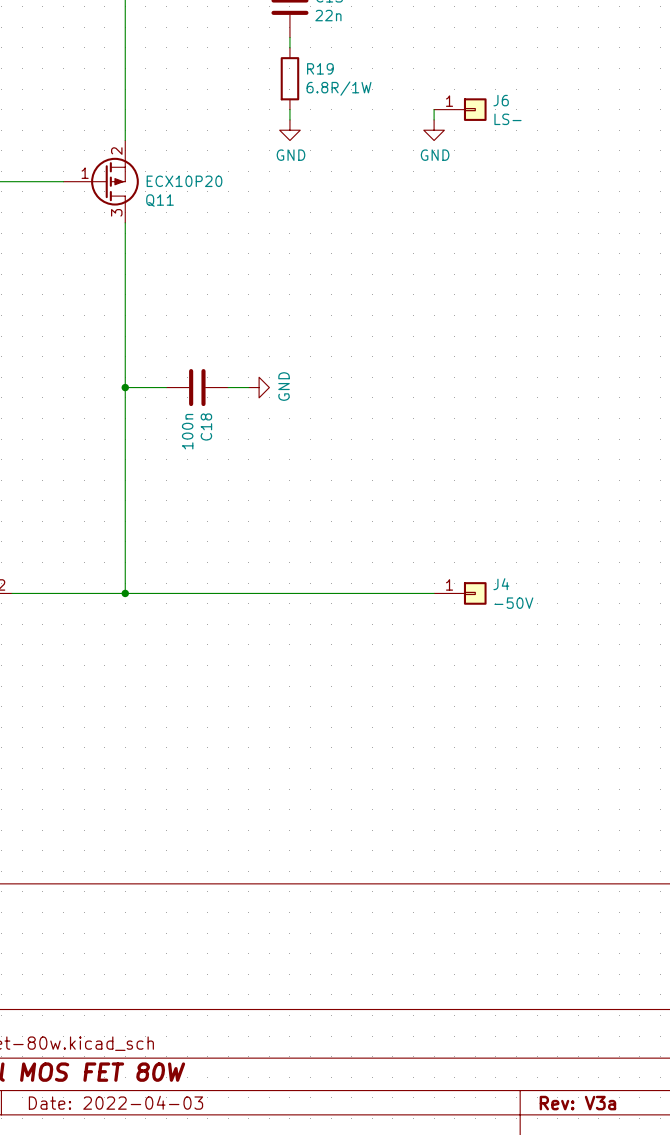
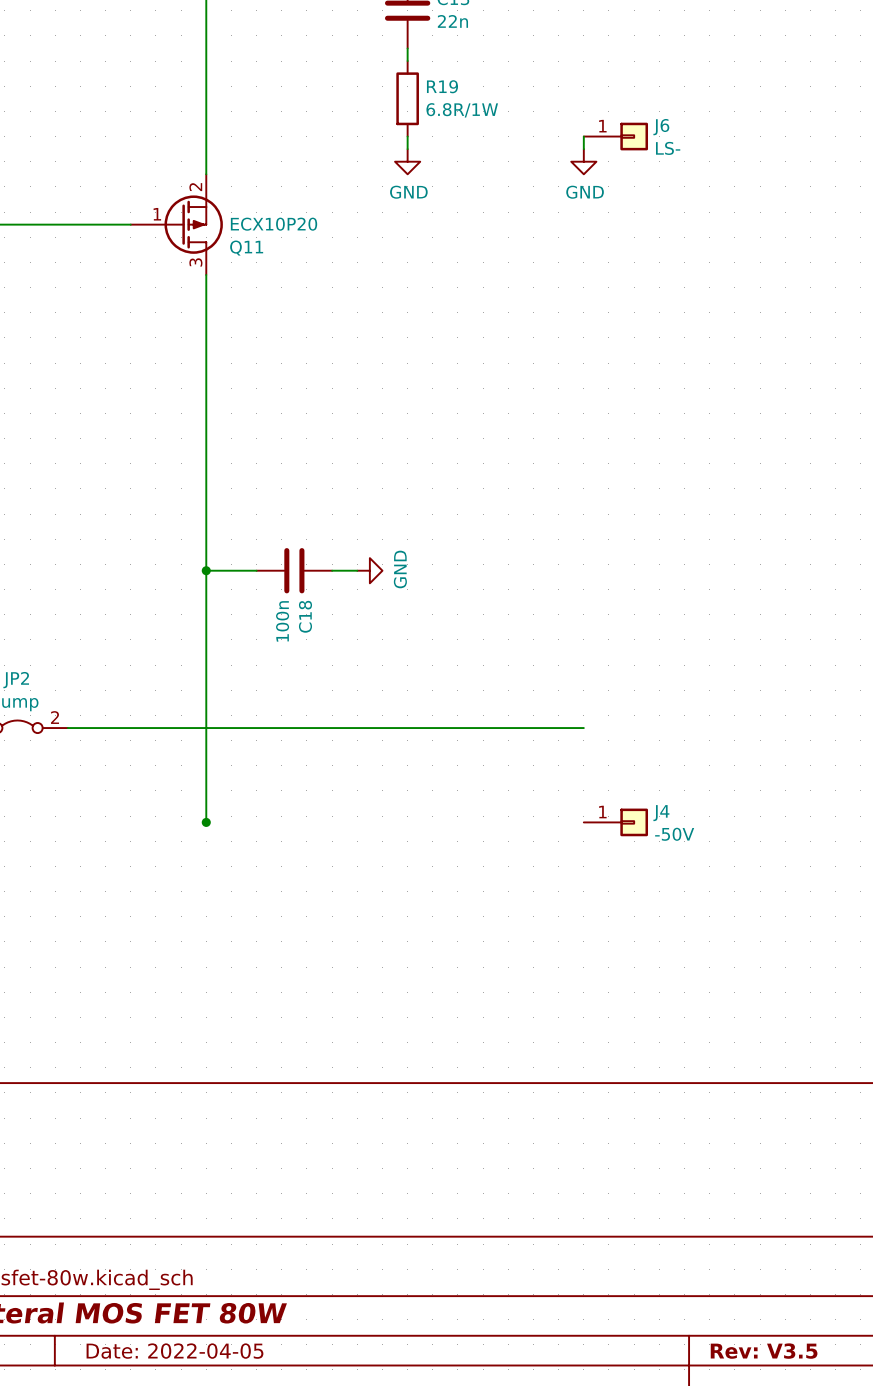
wire: (125, 387) (166, 387) -> (206, 570) (256, 570)
junction: (125, 387) -> none
C18 position: (197, 387) -> (294, 570)
wire: (228, 387) (248, 387) -> (332, 570) (357, 570)
power symbol position: GND (259, 387) -> GND (369, 570)
junction: none -> (206, 570)
wire: none -> (206, 728) (206, 822)
junction: (125, 593) -> none
J4 position: (460, 593) -> (615, 822)
junction: none -> (206, 822)
title block: Date: 2022-04-03 (115, 1102) -> Date: 2022-04-05 (174, 1351)
title block: Rev: V3a (577, 1103) -> Rev: V3.5 (764, 1351)

